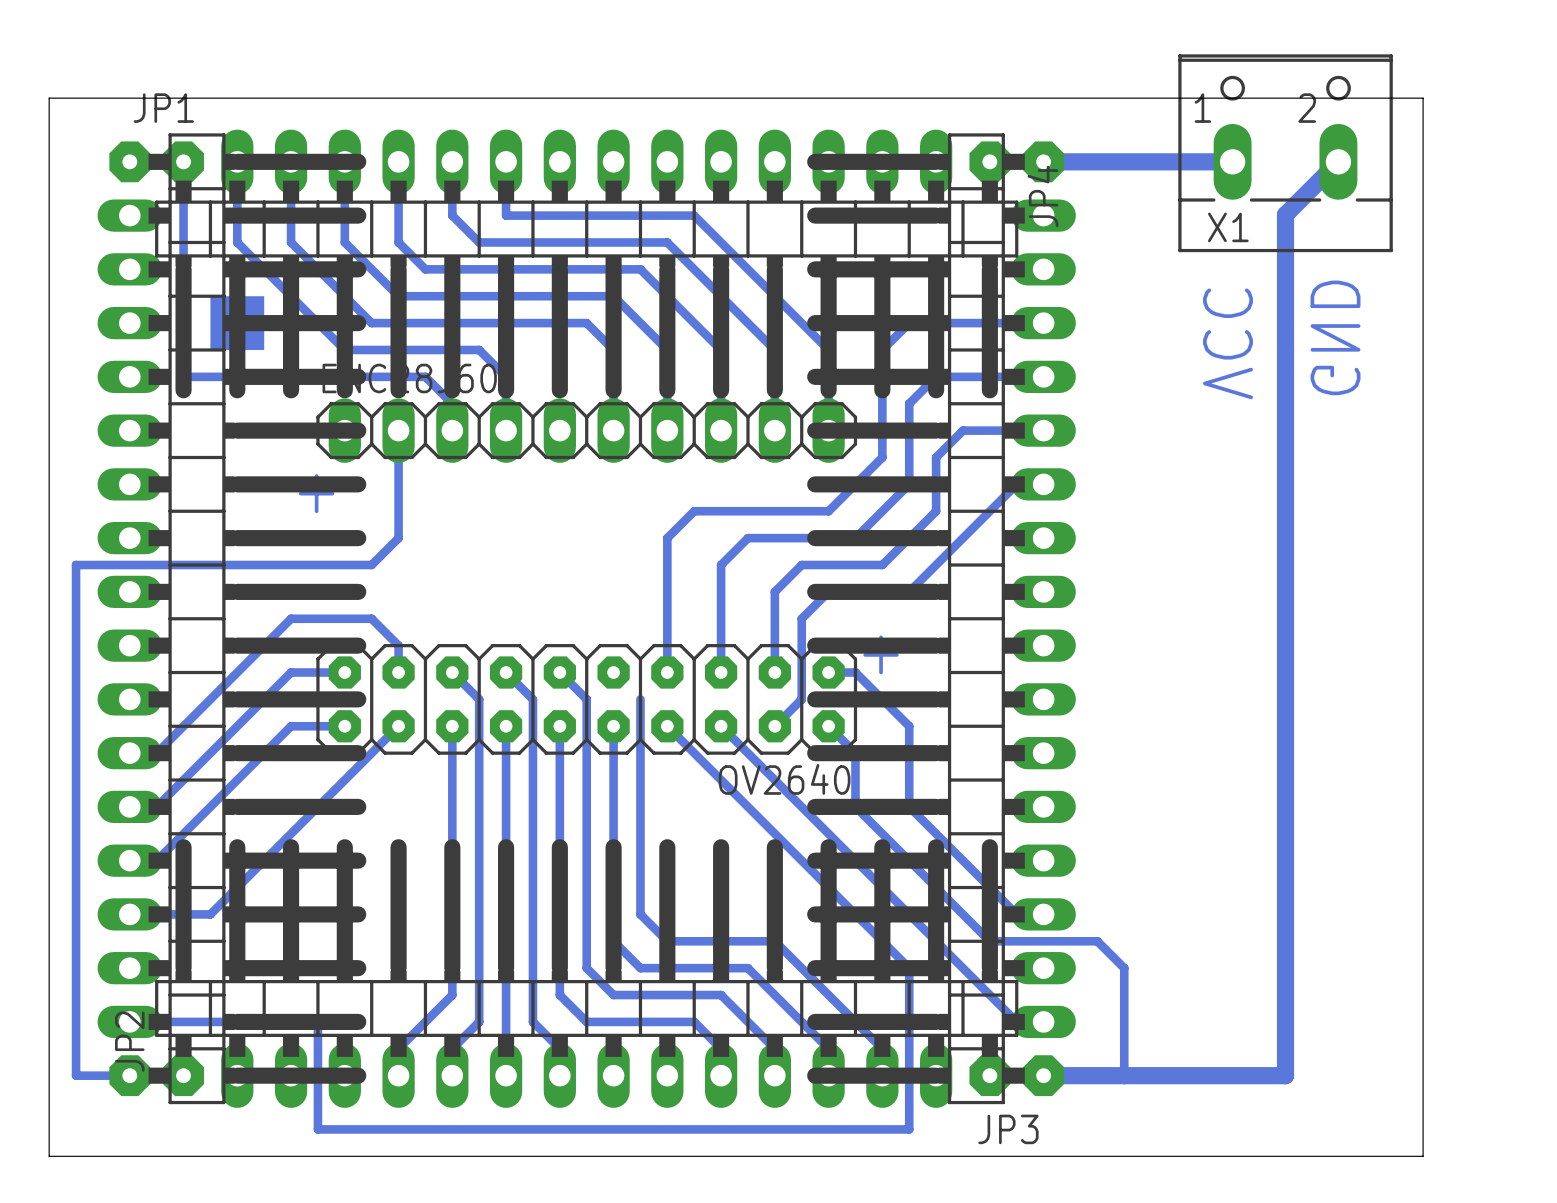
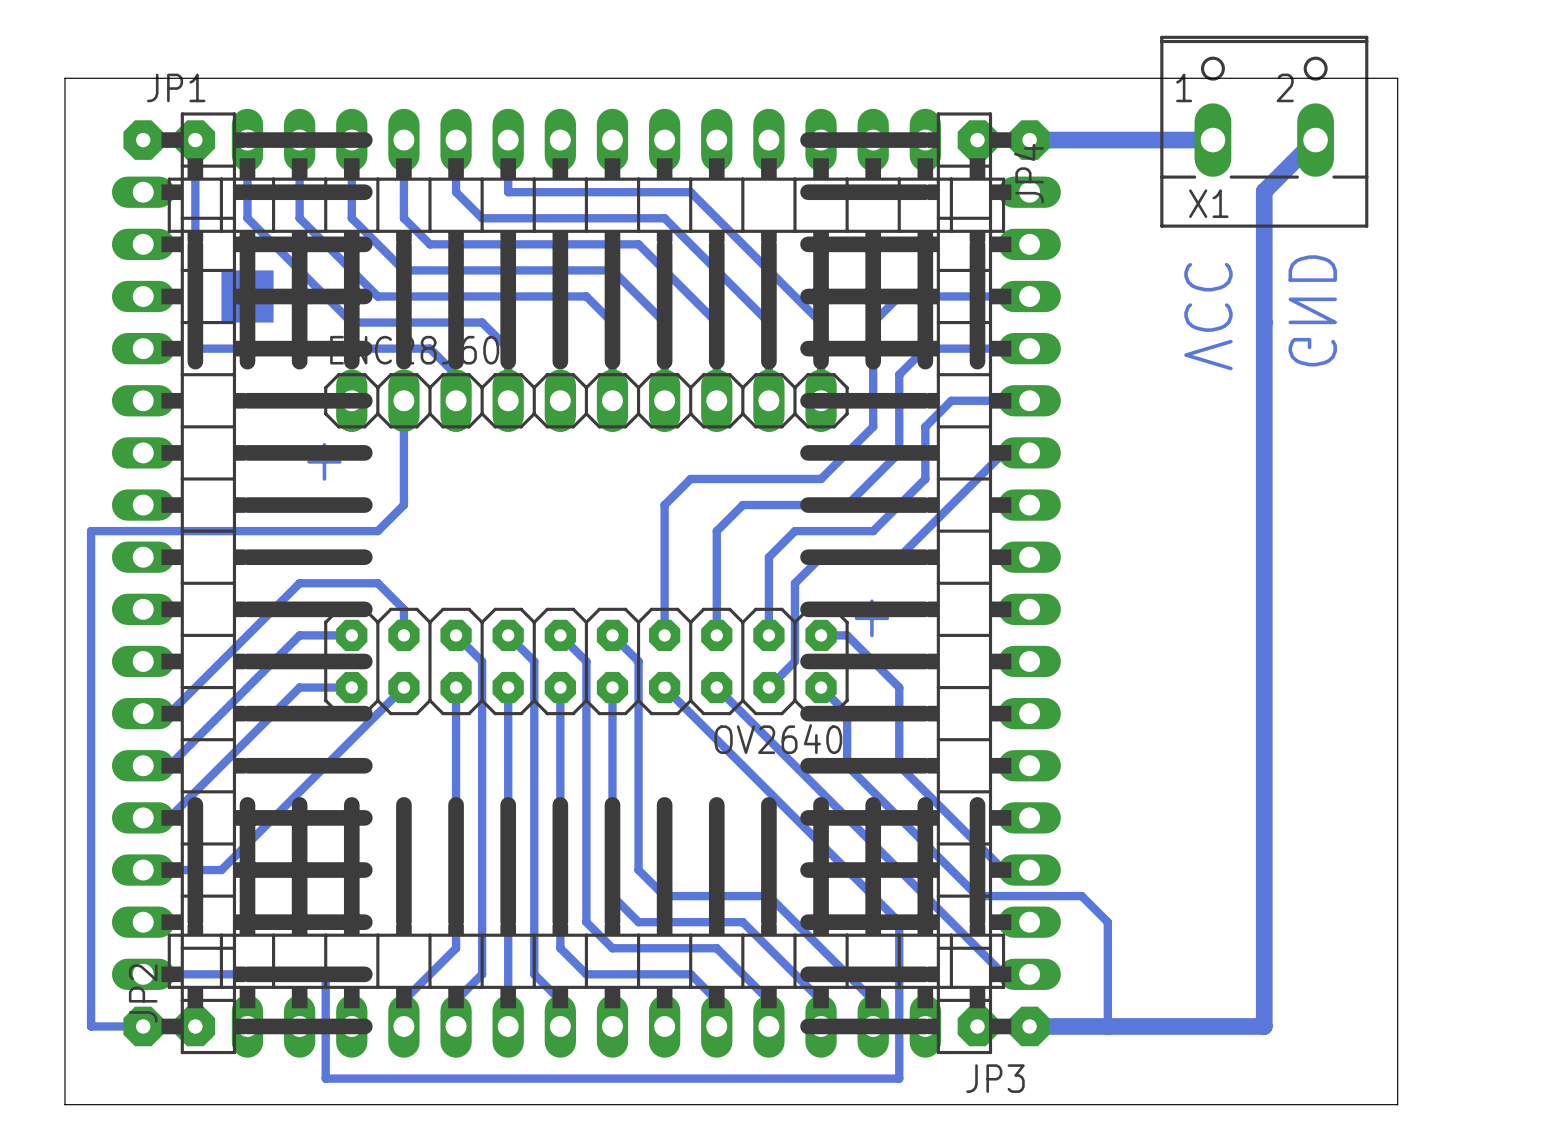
bottom track: none -> (612, 635) (638, 661)

